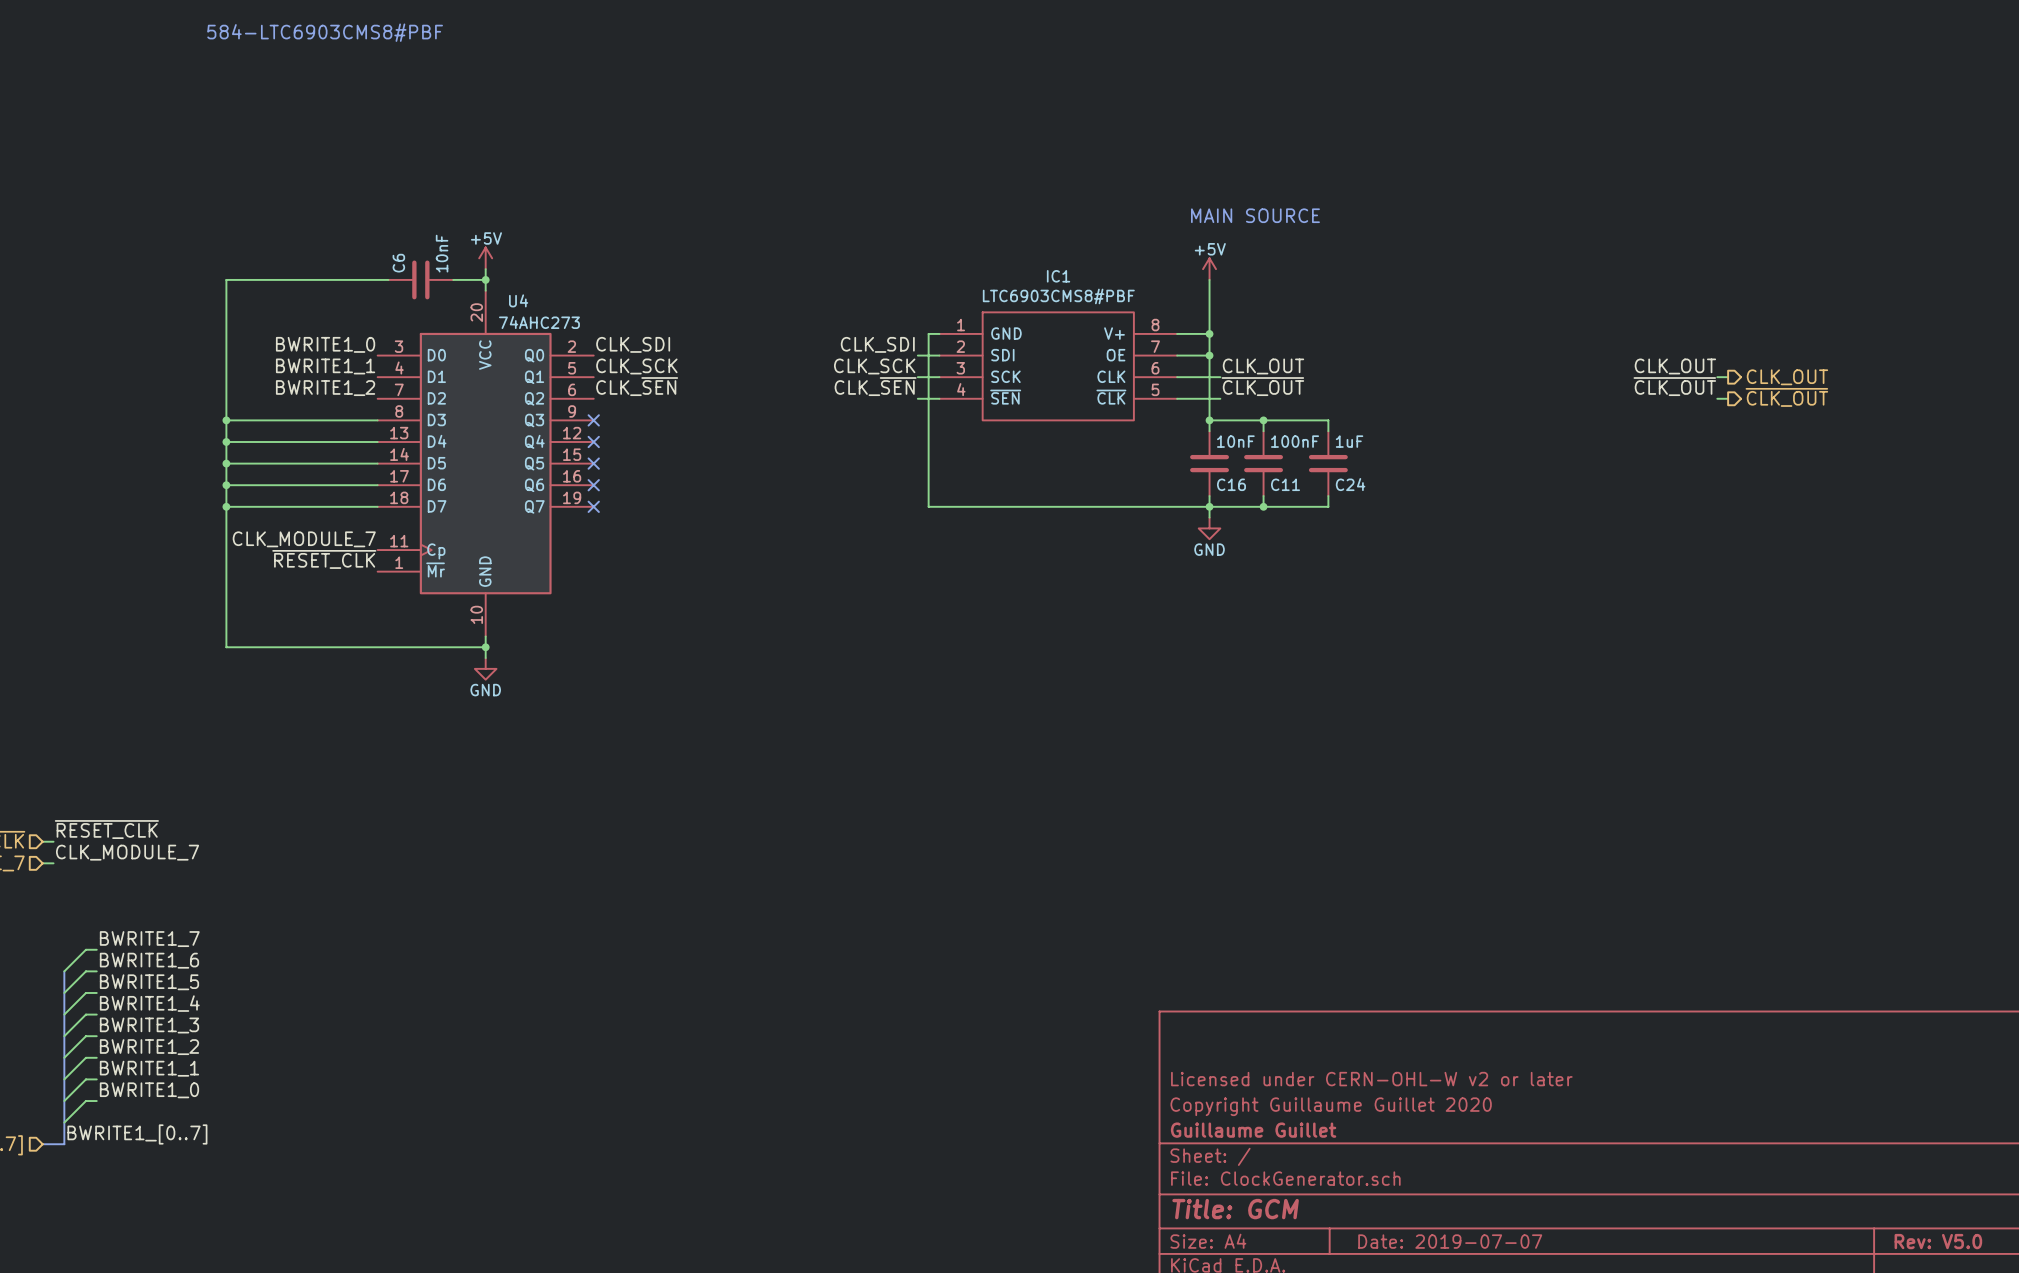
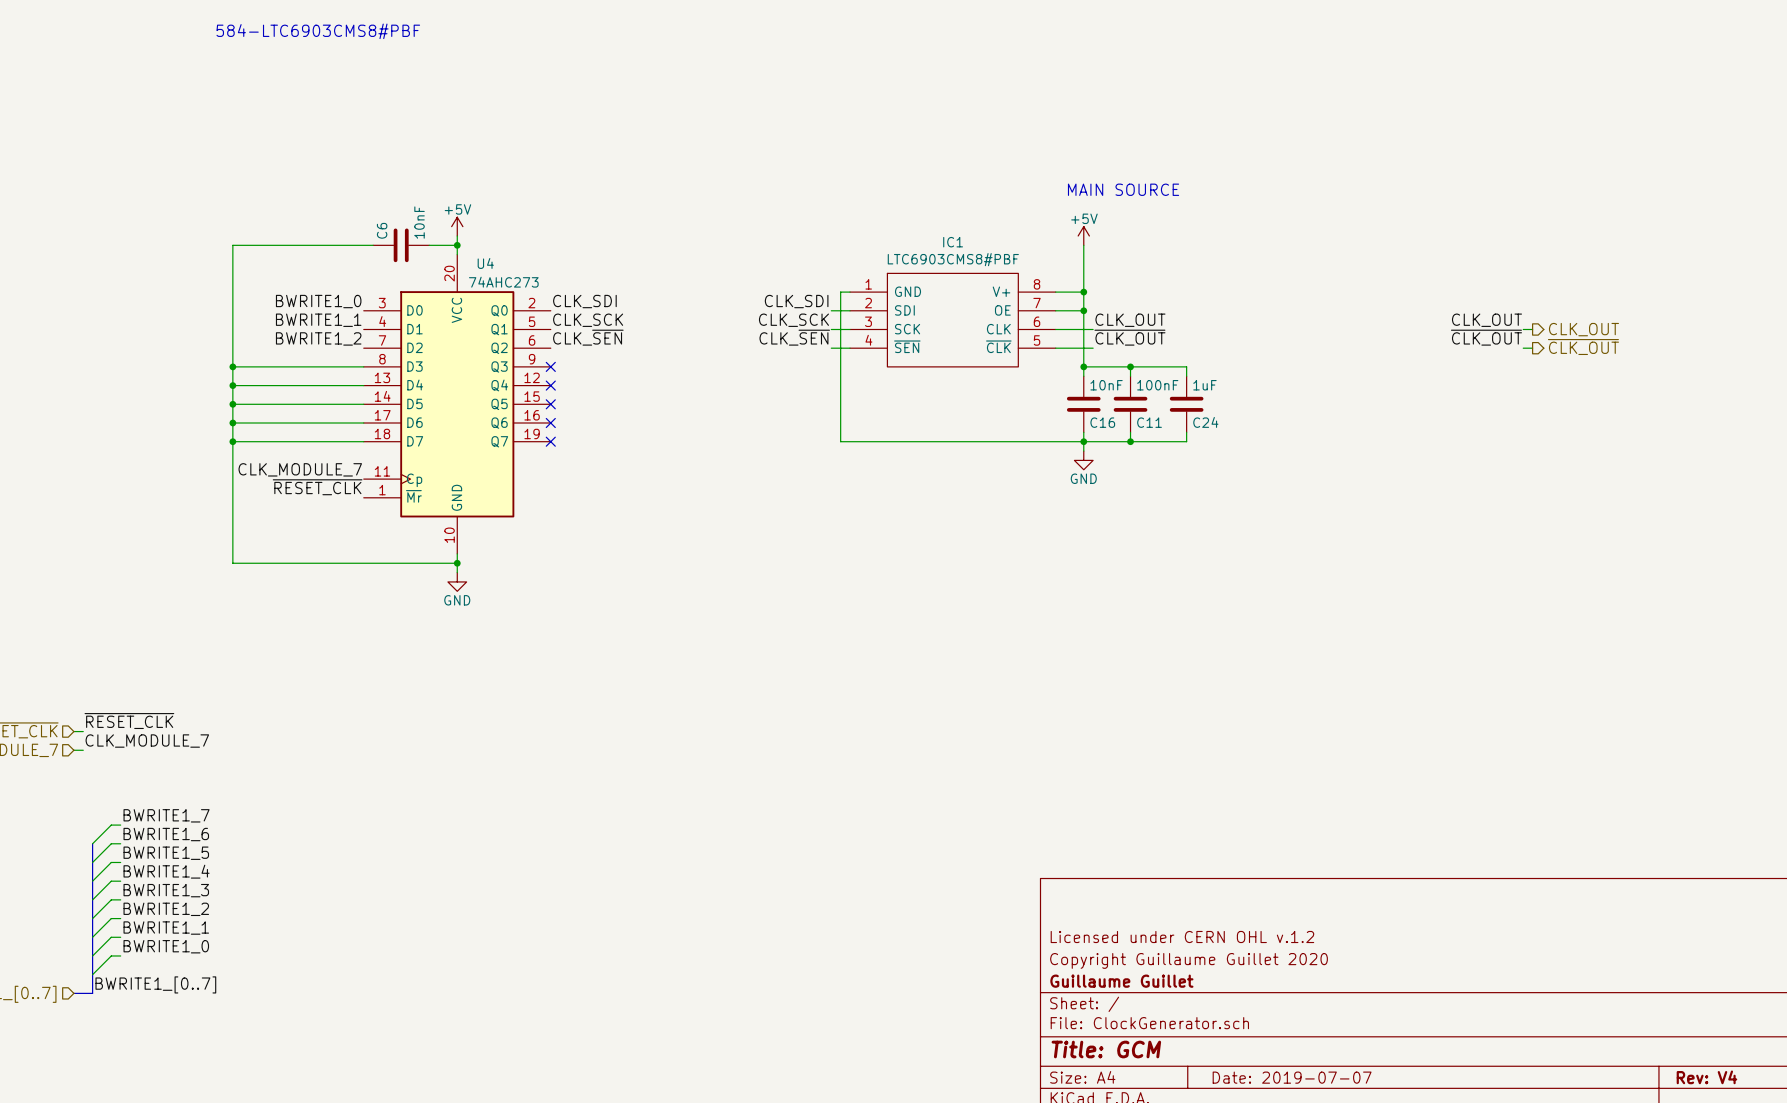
title block: Licensed under CERN-OHL-W v2 or later (1371, 1079) -> Licensed under CERN OHL v.1.2 (1182, 937)
title block: Rev: V5.0 (1938, 1241) -> Rev: V4 (1706, 1077)

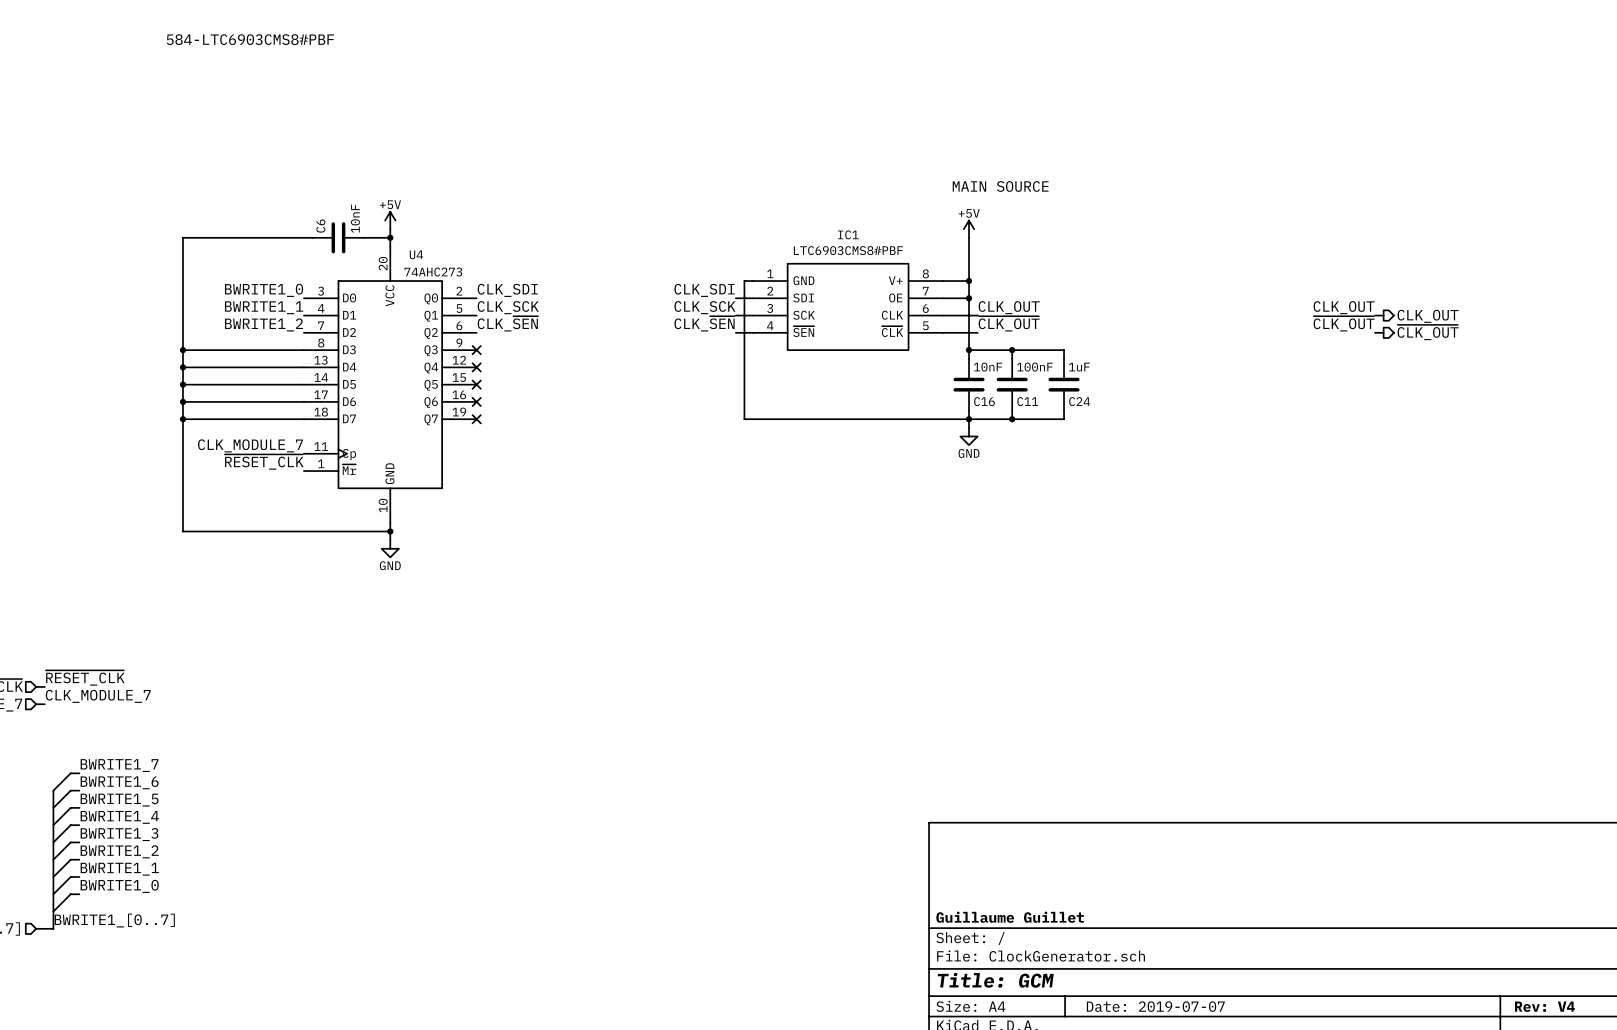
title block: Licensed under CERN OHL v.1.2 (1182, 937) -> none
title block: Copyright Guillaume Guillet 2020 (1189, 960) -> none

